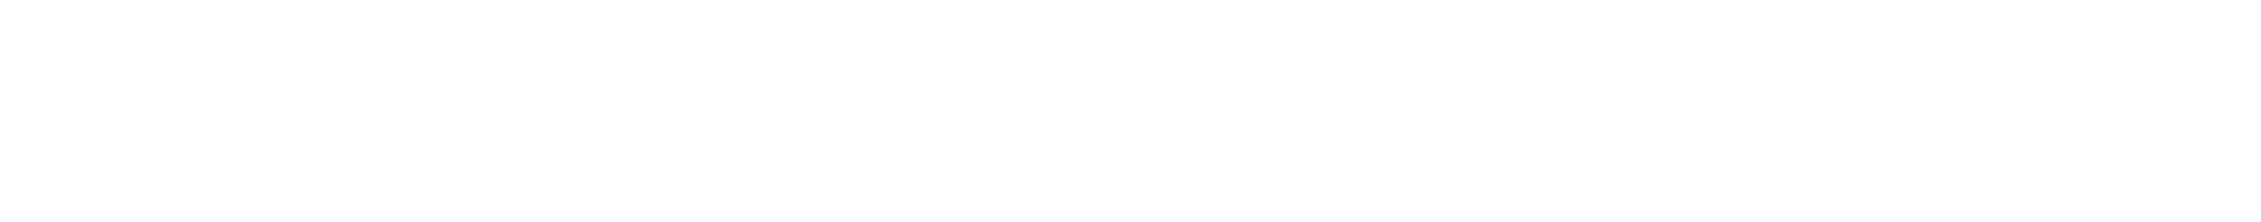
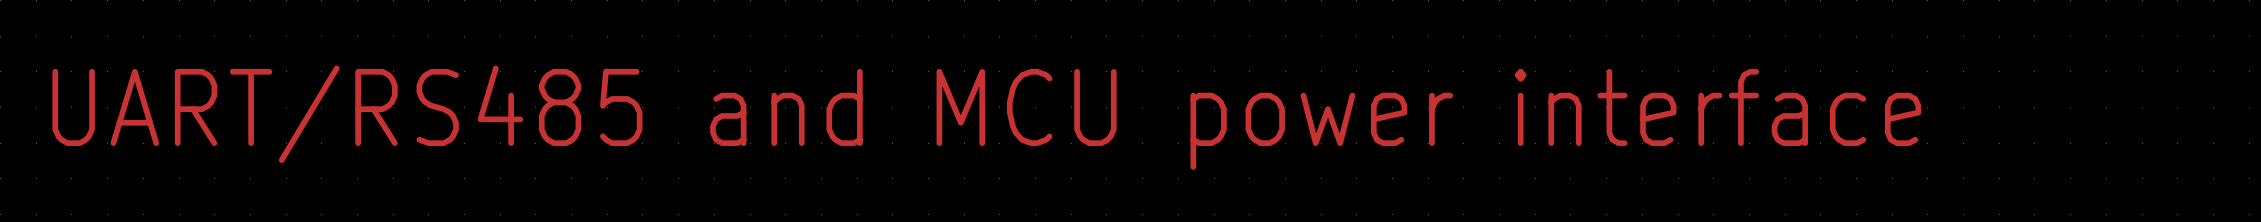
text: none -> UART/RS485 and MCU power interface (986, 117)

